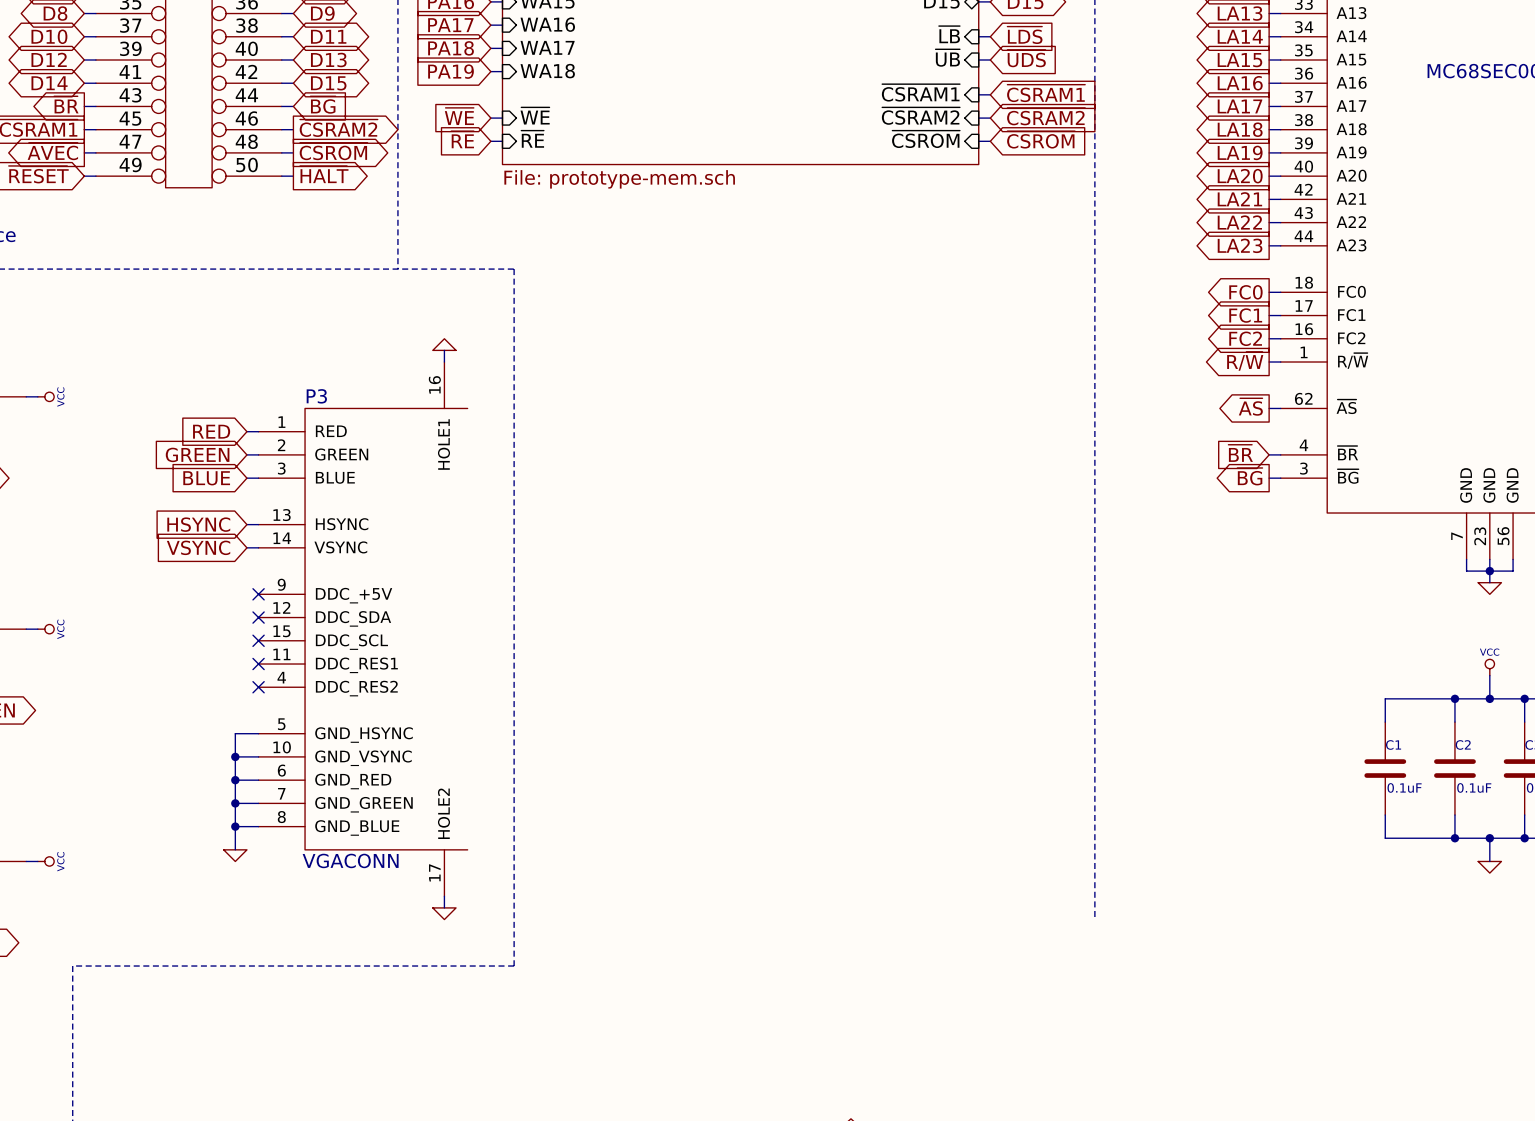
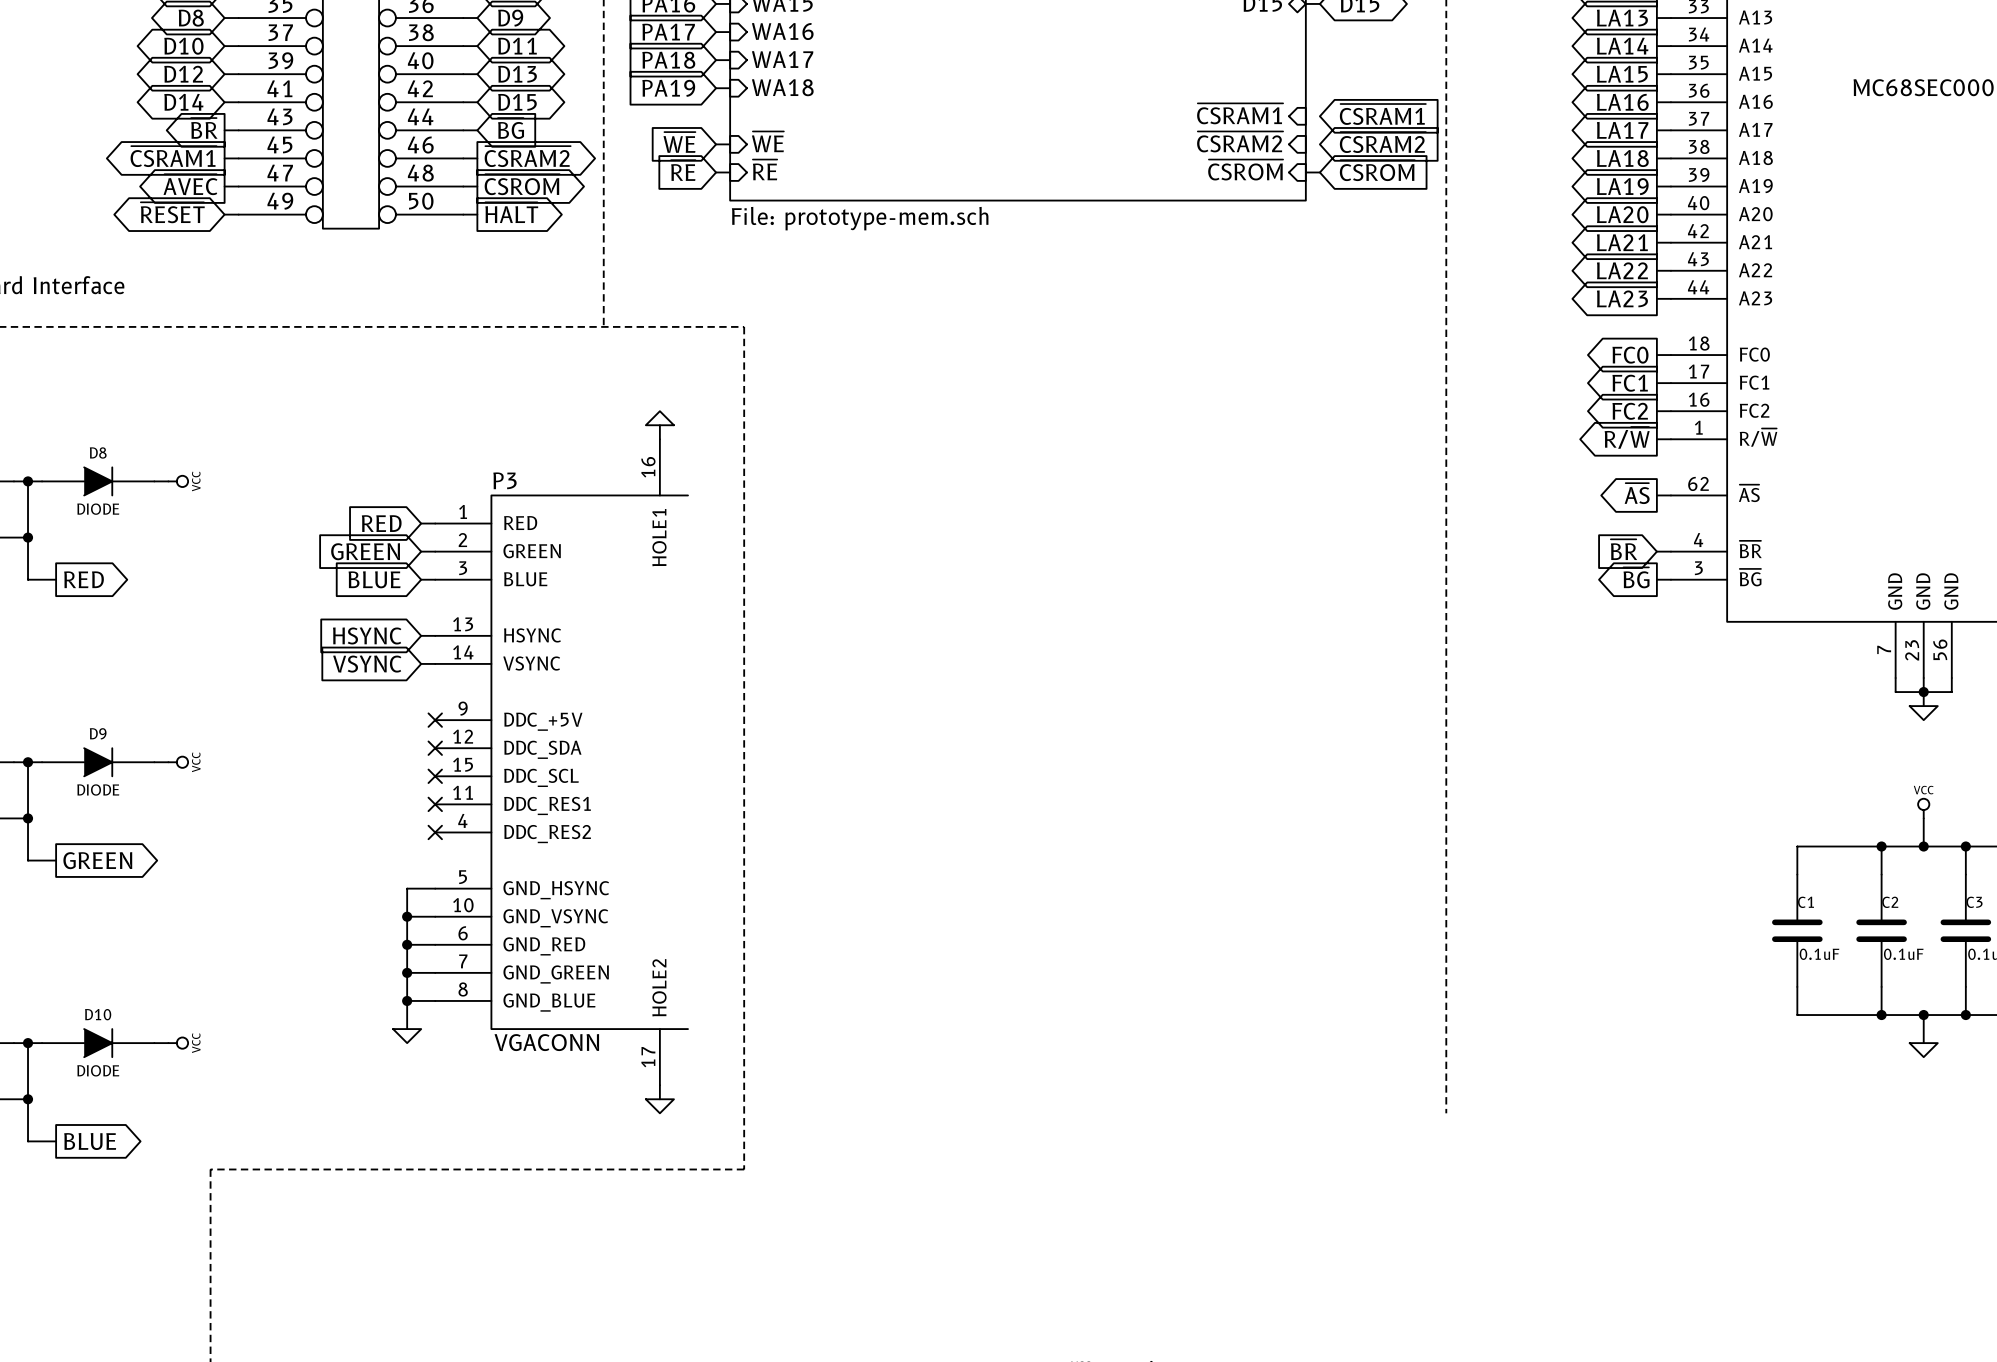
sheet pin: ~{LB} (949, 34) -> none
global label: ~{LDS} (1024, 35) -> none
wire: (978, 36) (990, 36) -> none
sheet pin: ~{UB} (947, 58) -> none
global label: ~{UDS} (1026, 58) -> none
wire: (978, 59) (990, 59) -> none
wire: (978, 94) (990, 94) -> none
wire: (978, 118) (990, 118) -> none

